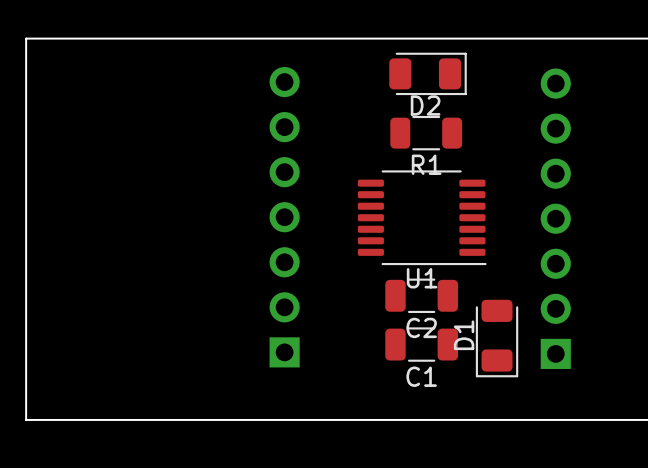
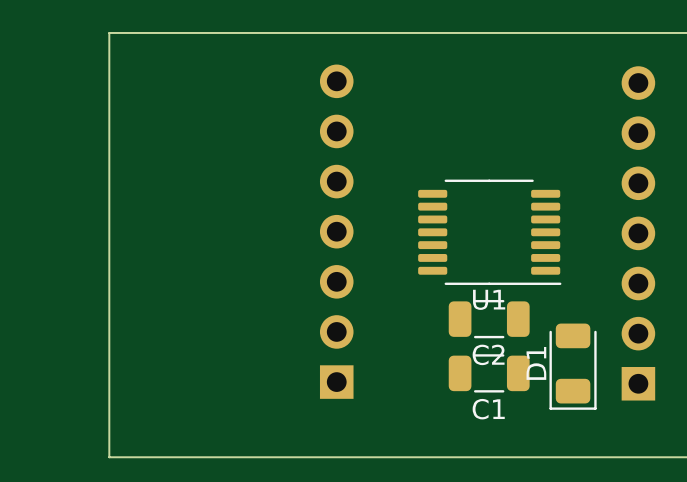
board edge: (80, 38) (26, 38) (26, 419) (80, 419) -> (109, 32) (109, 457)
D2: (428, 73) -> none
R1: (426, 133) -> none

